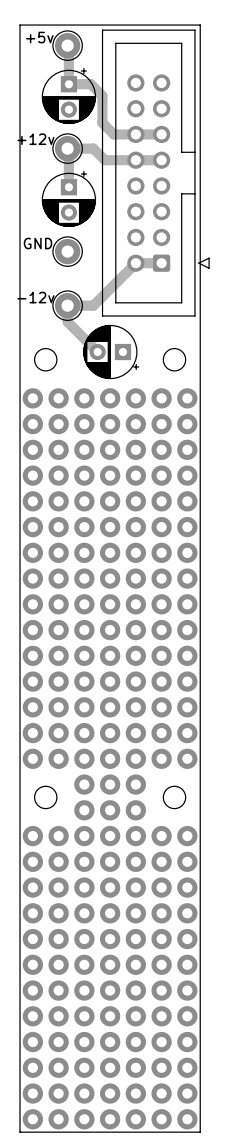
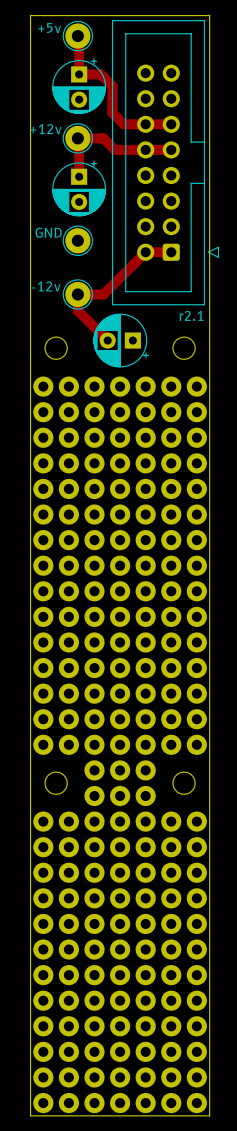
text: none -> r2.1 (191, 315)

